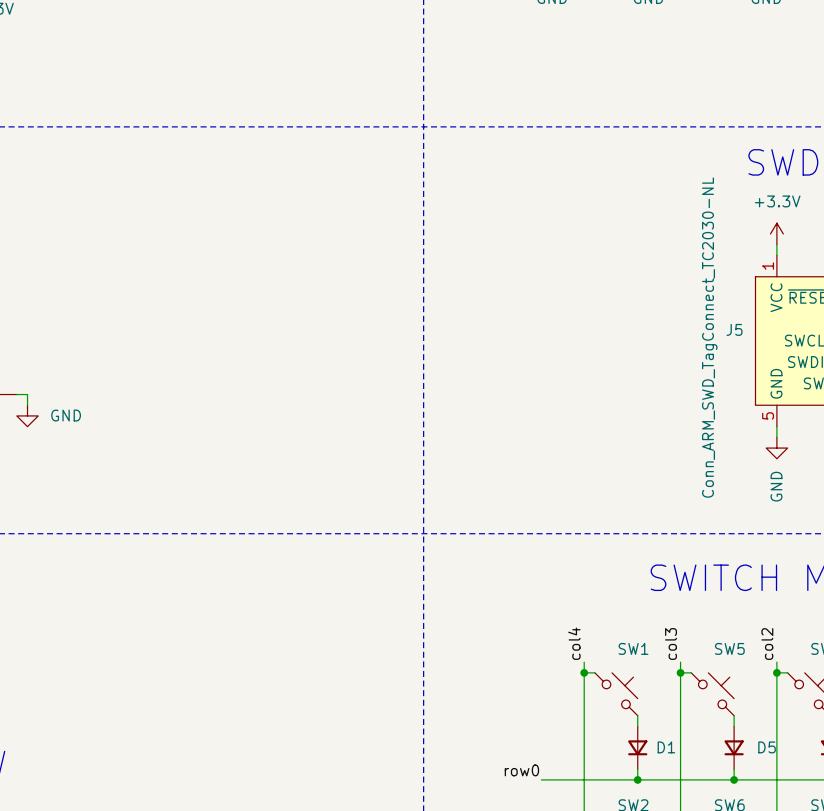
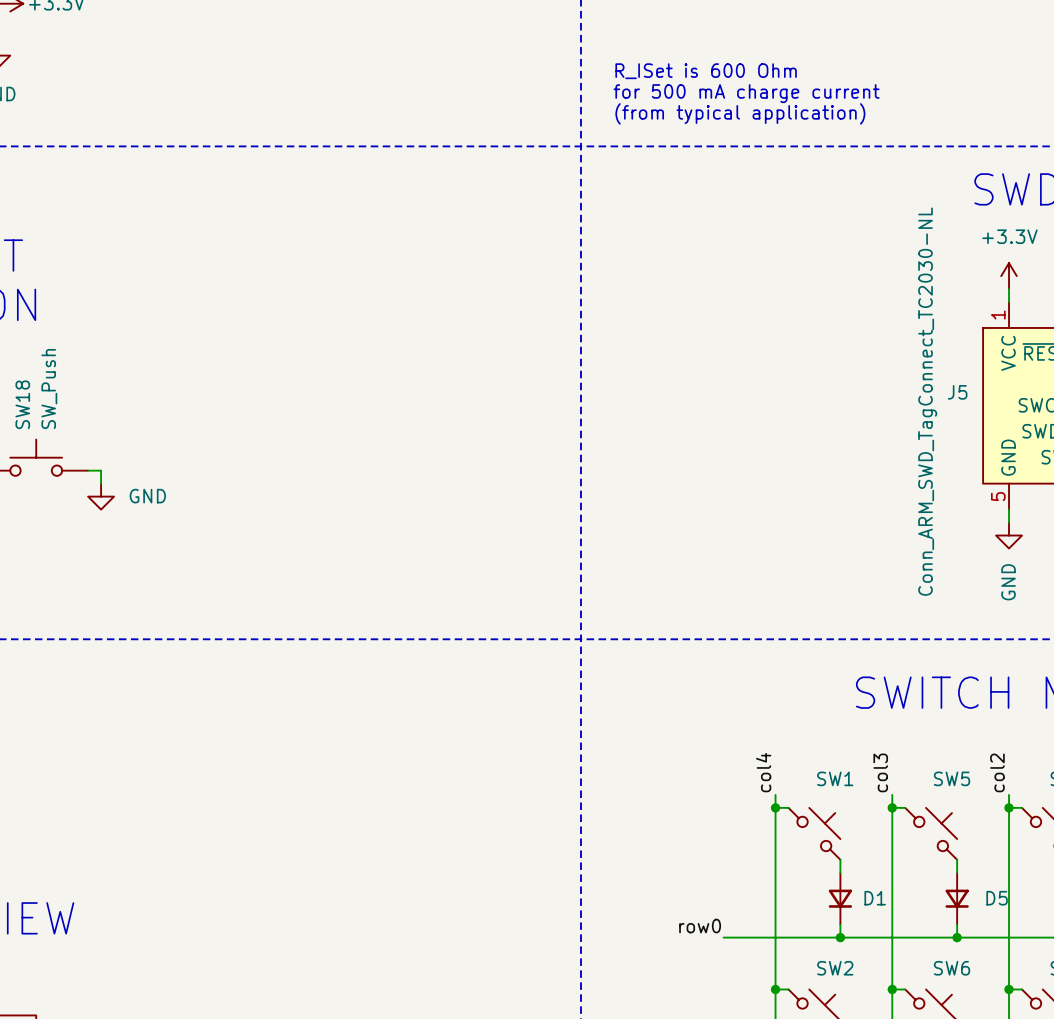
text: none -> R_ISet is 600 Ohm (706, 71)
text: none -> for 500 mA charge current (746, 93)
text: none -> (from typical application) (740, 113)

